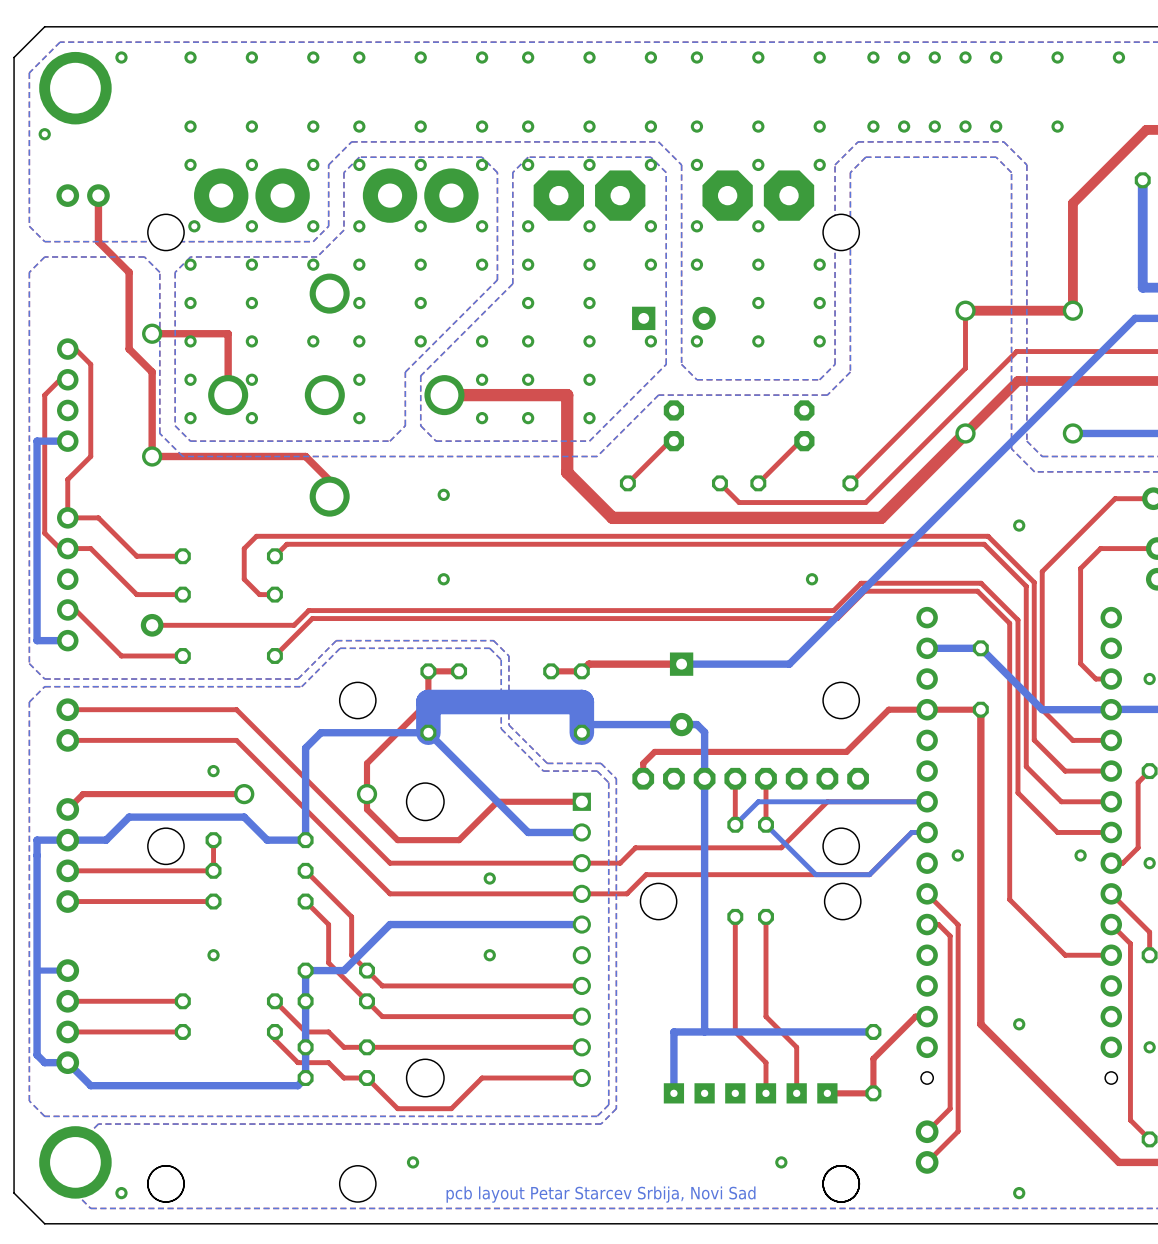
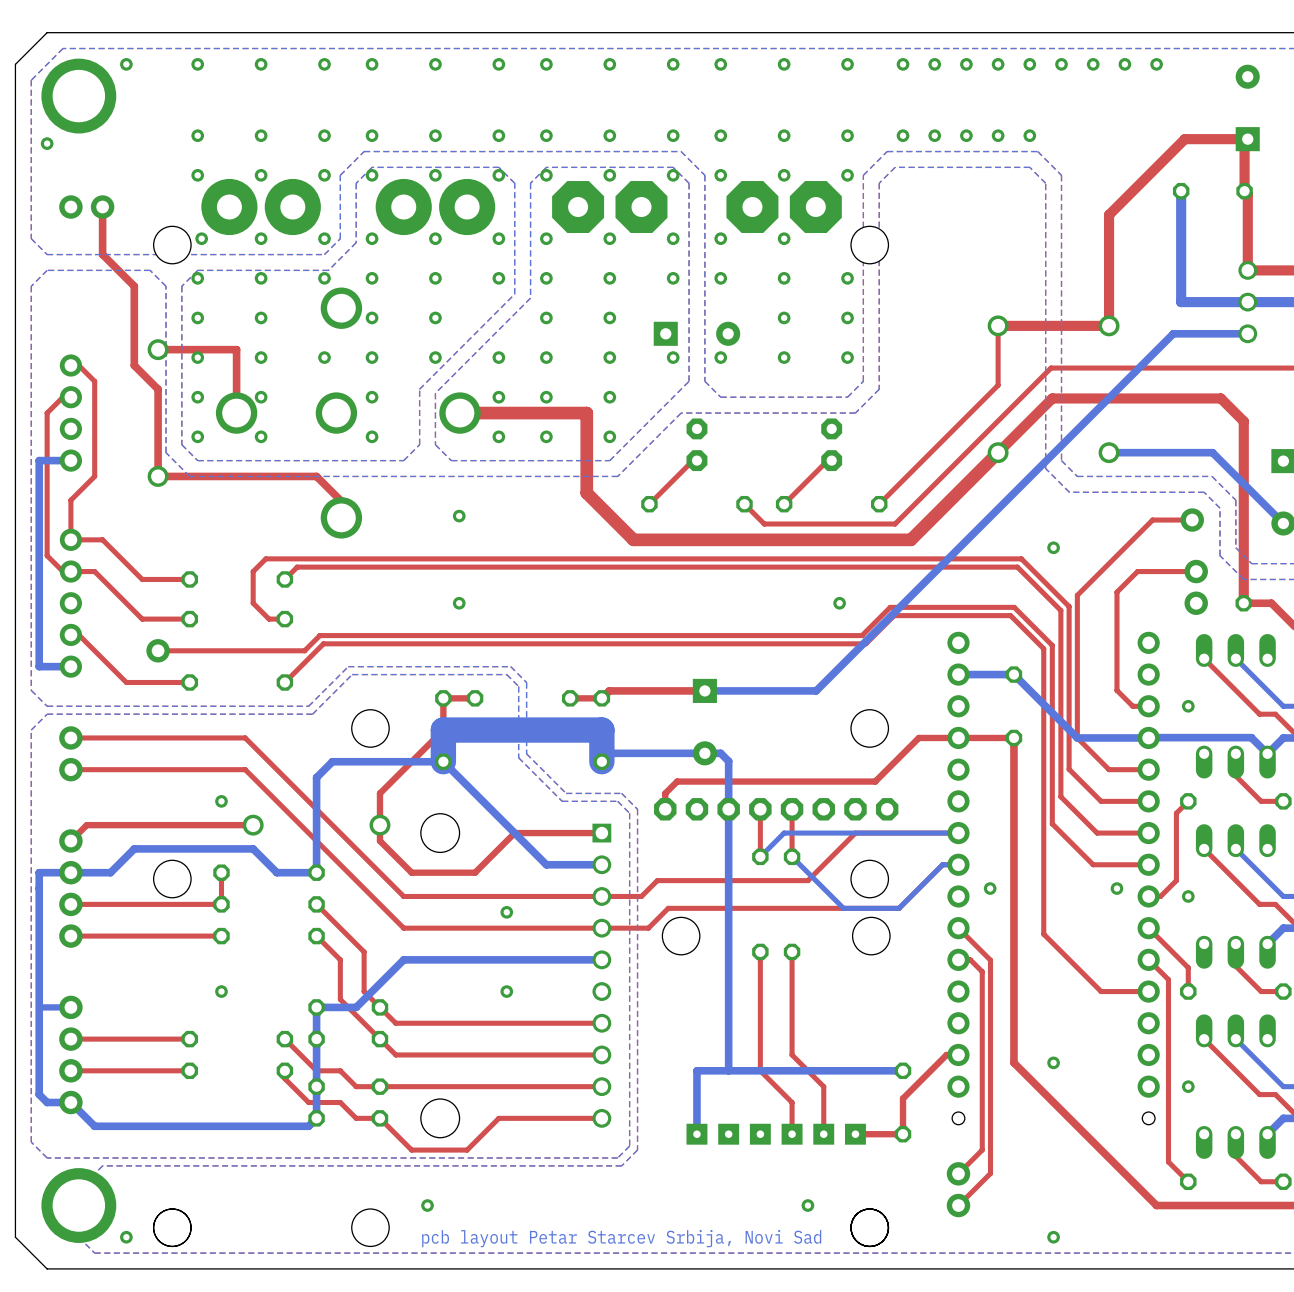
via: none -> (1061, 64)
via: none -> (1124, 64)
via: (1057, 126) -> none

